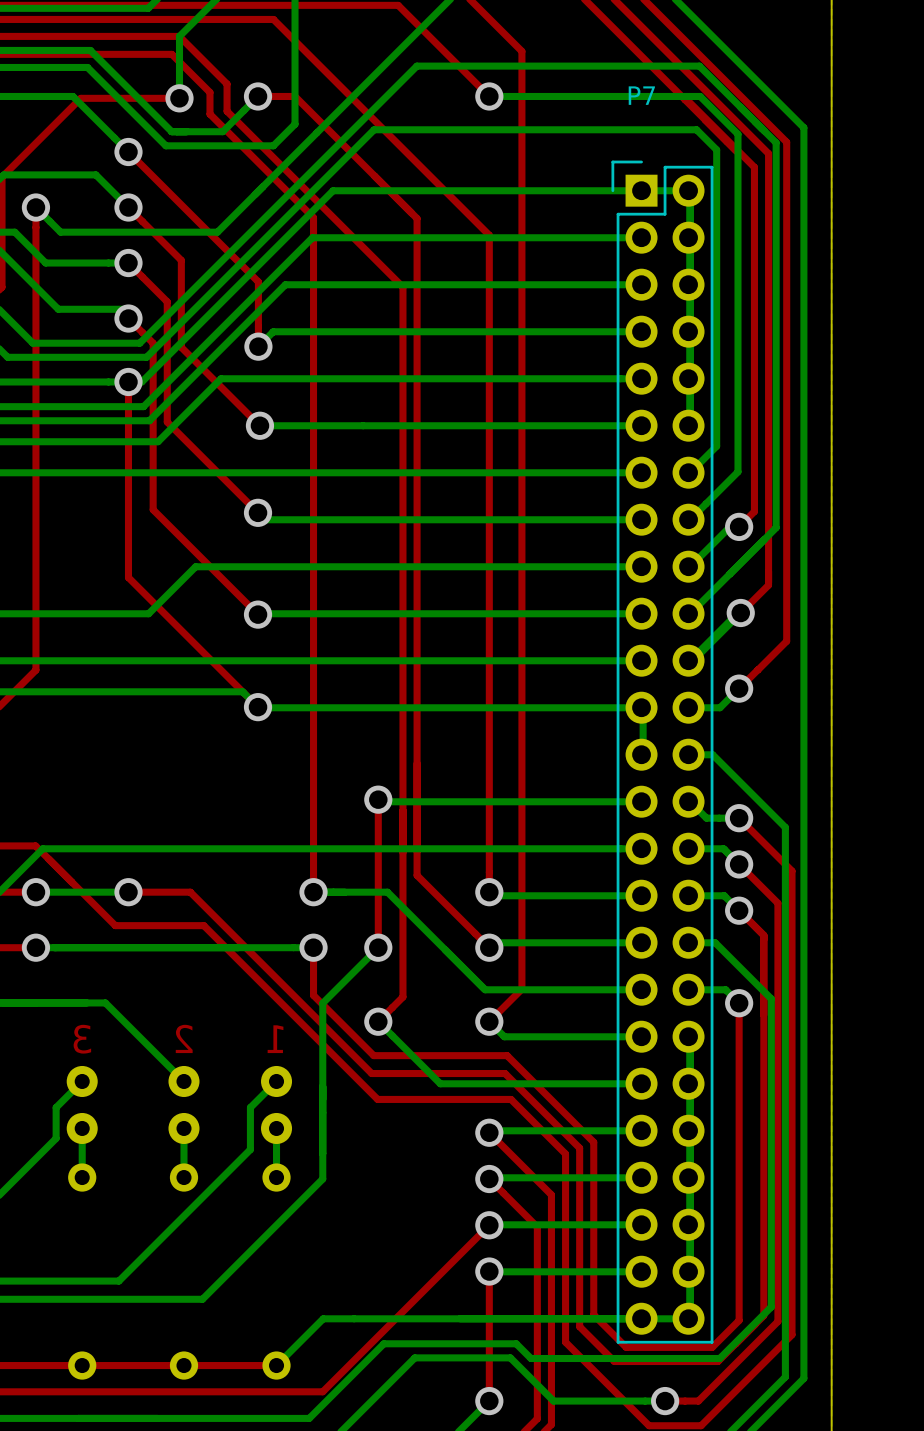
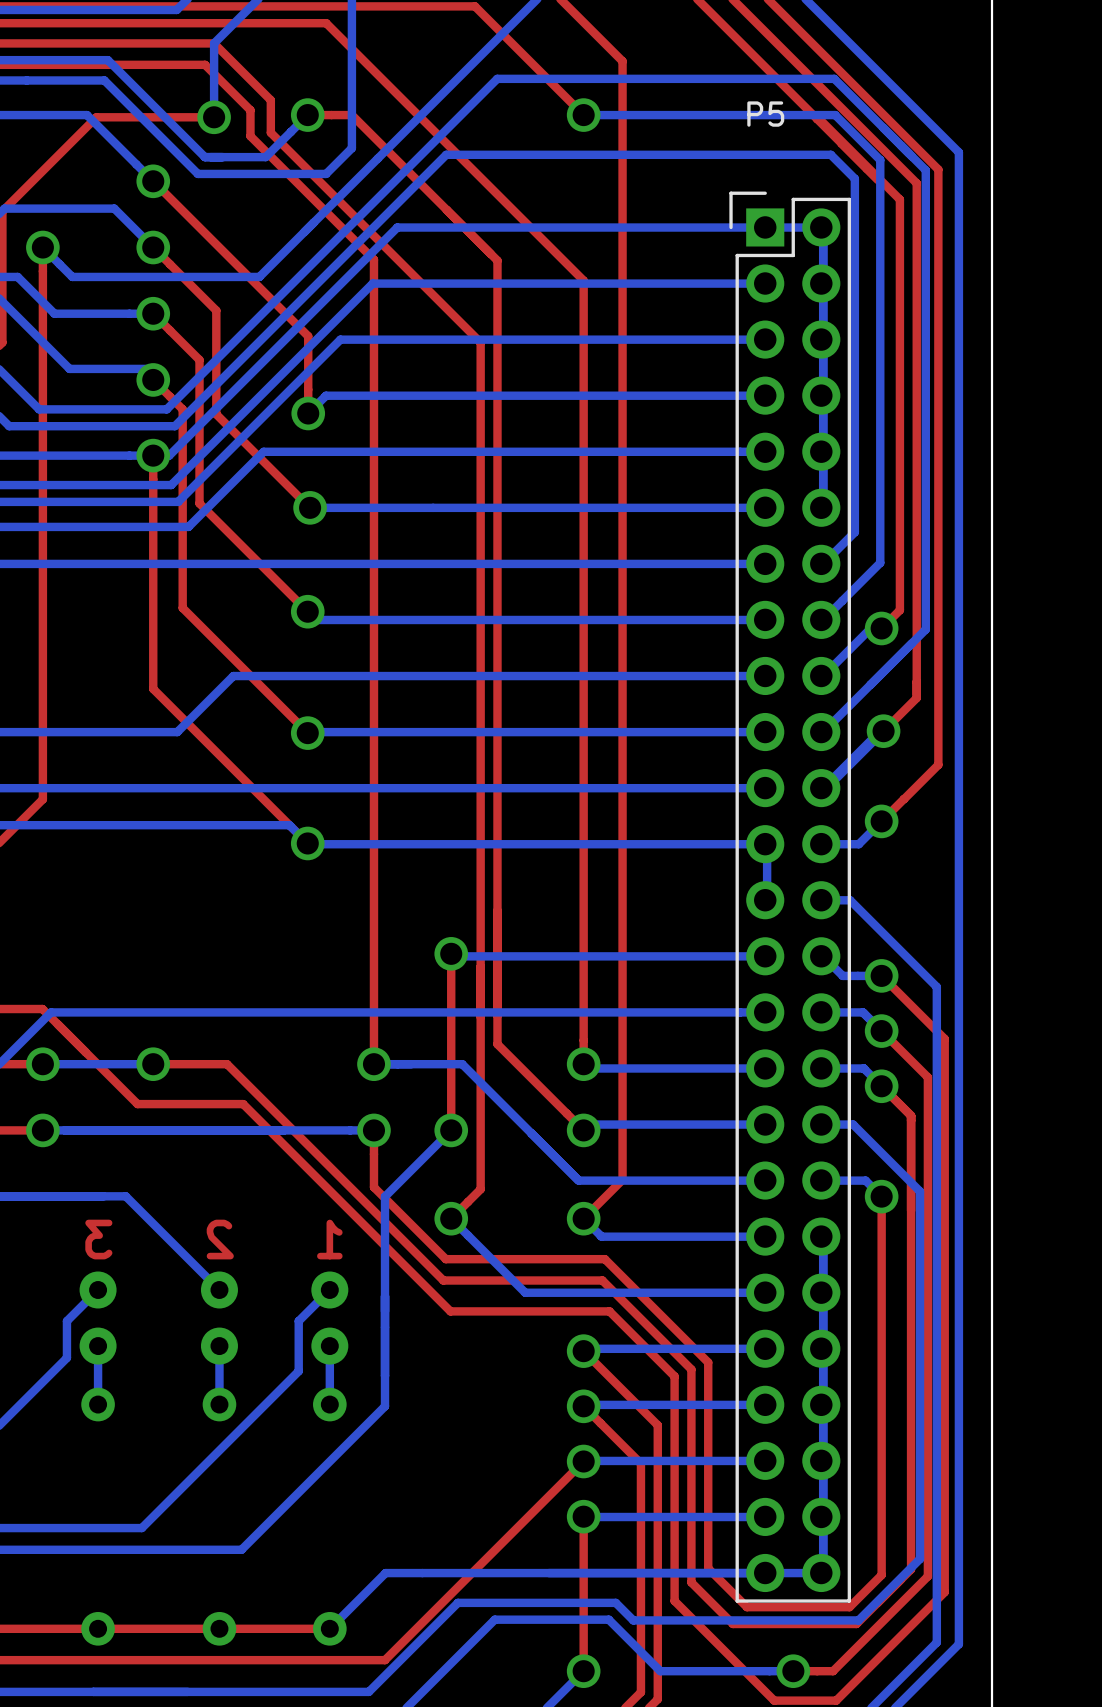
P7 name: P7 (641, 95) -> P5 (765, 114)

